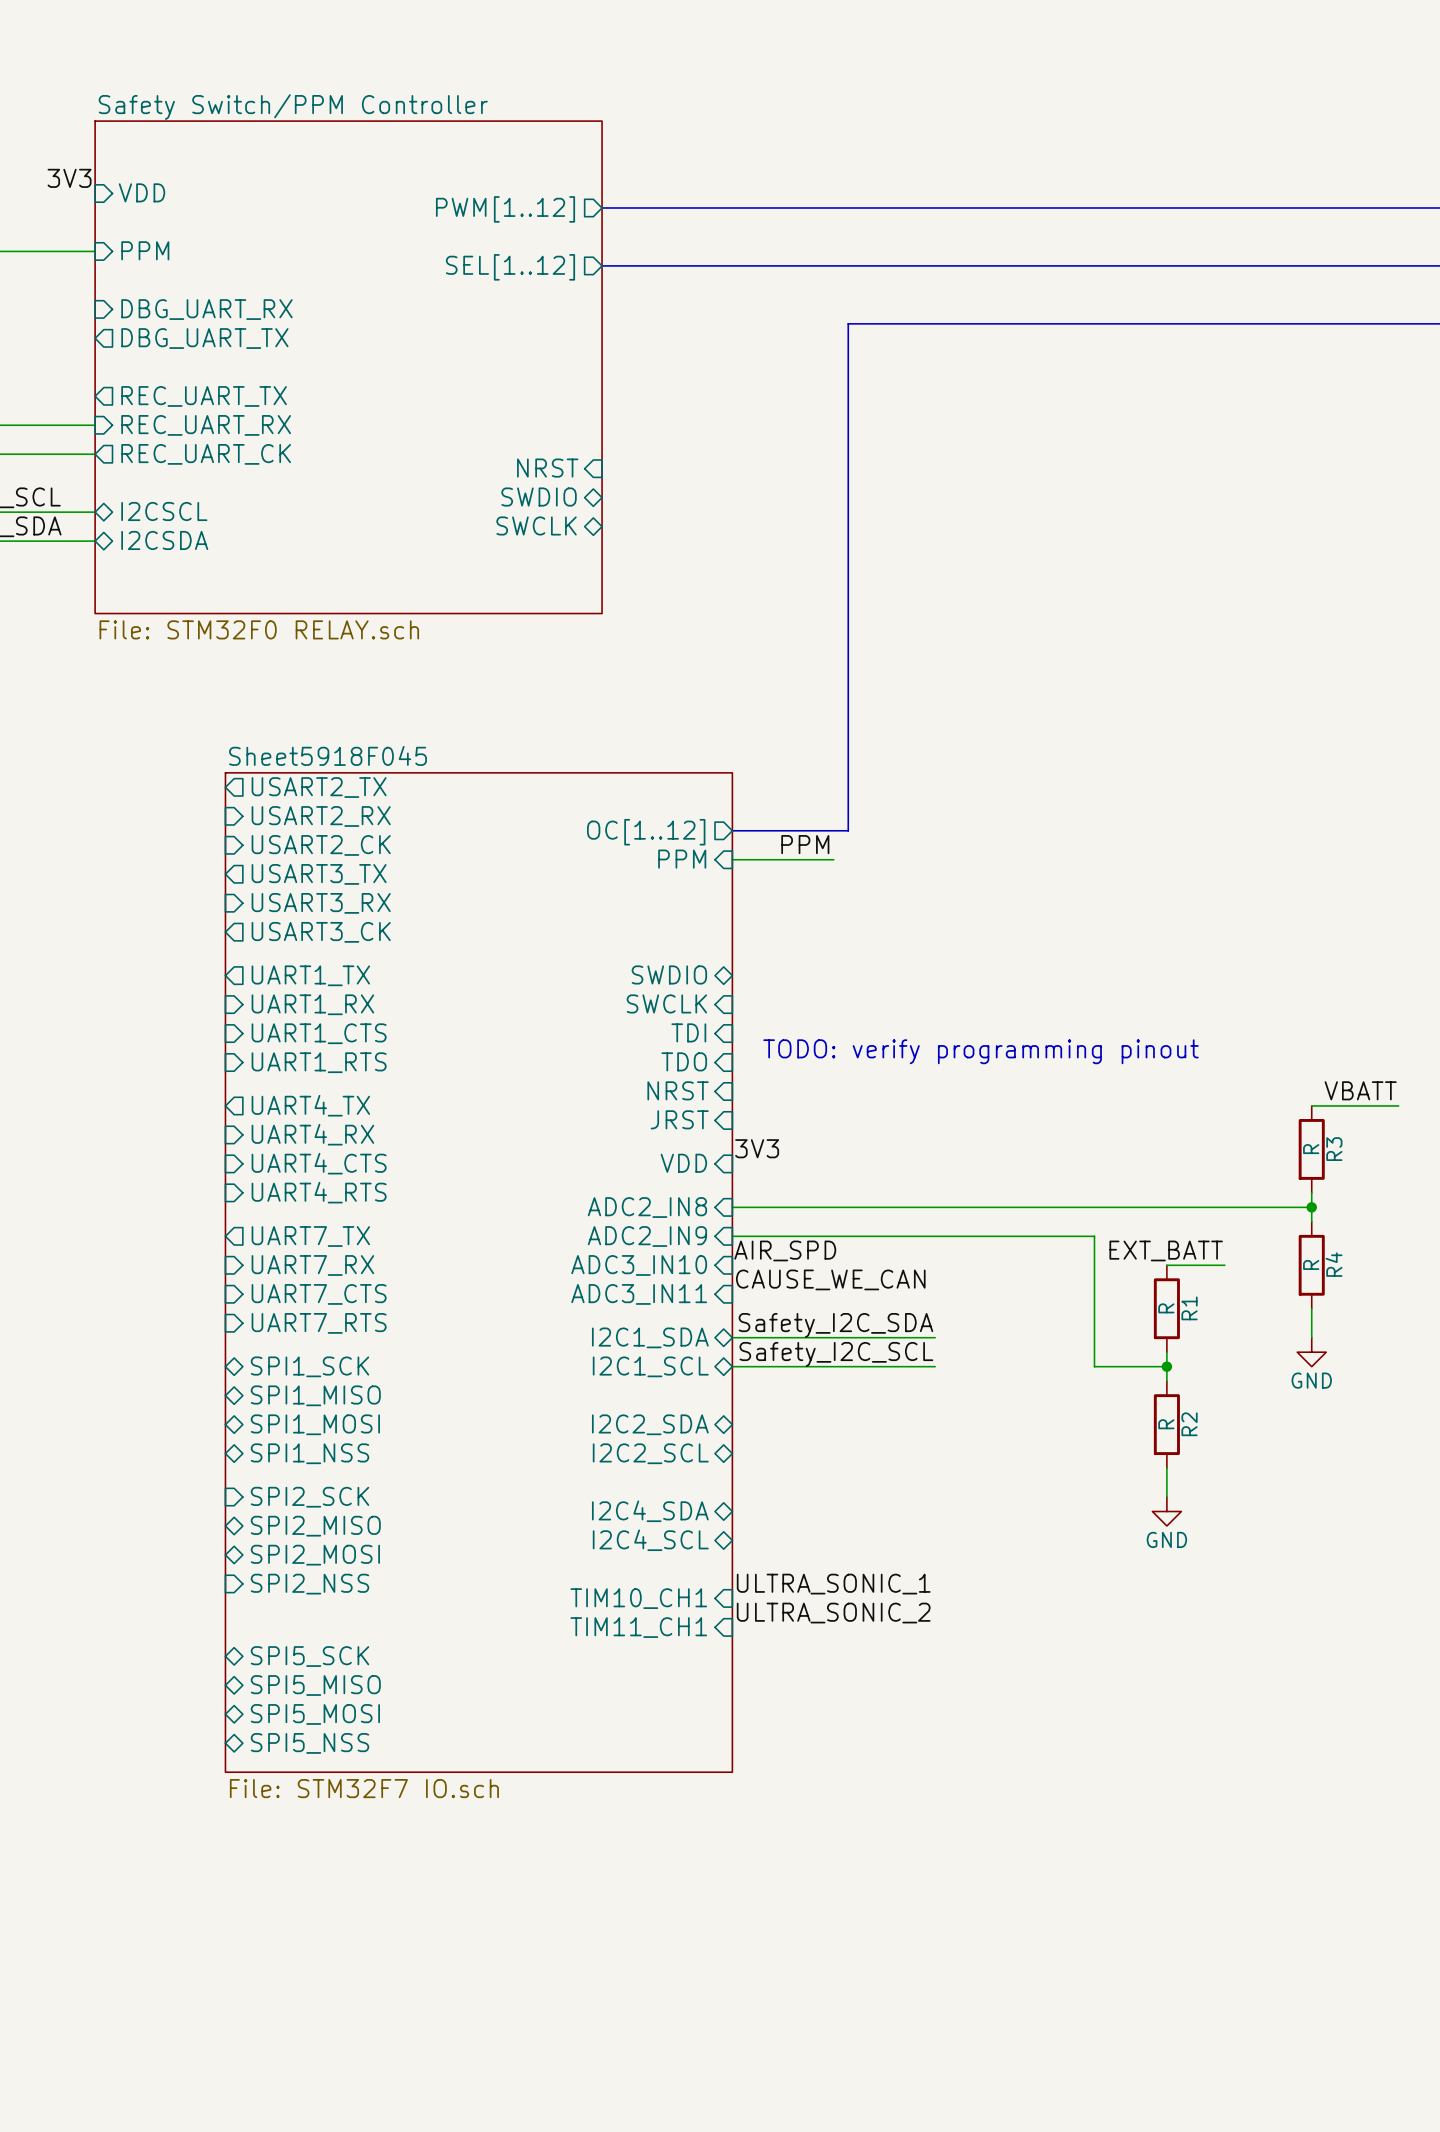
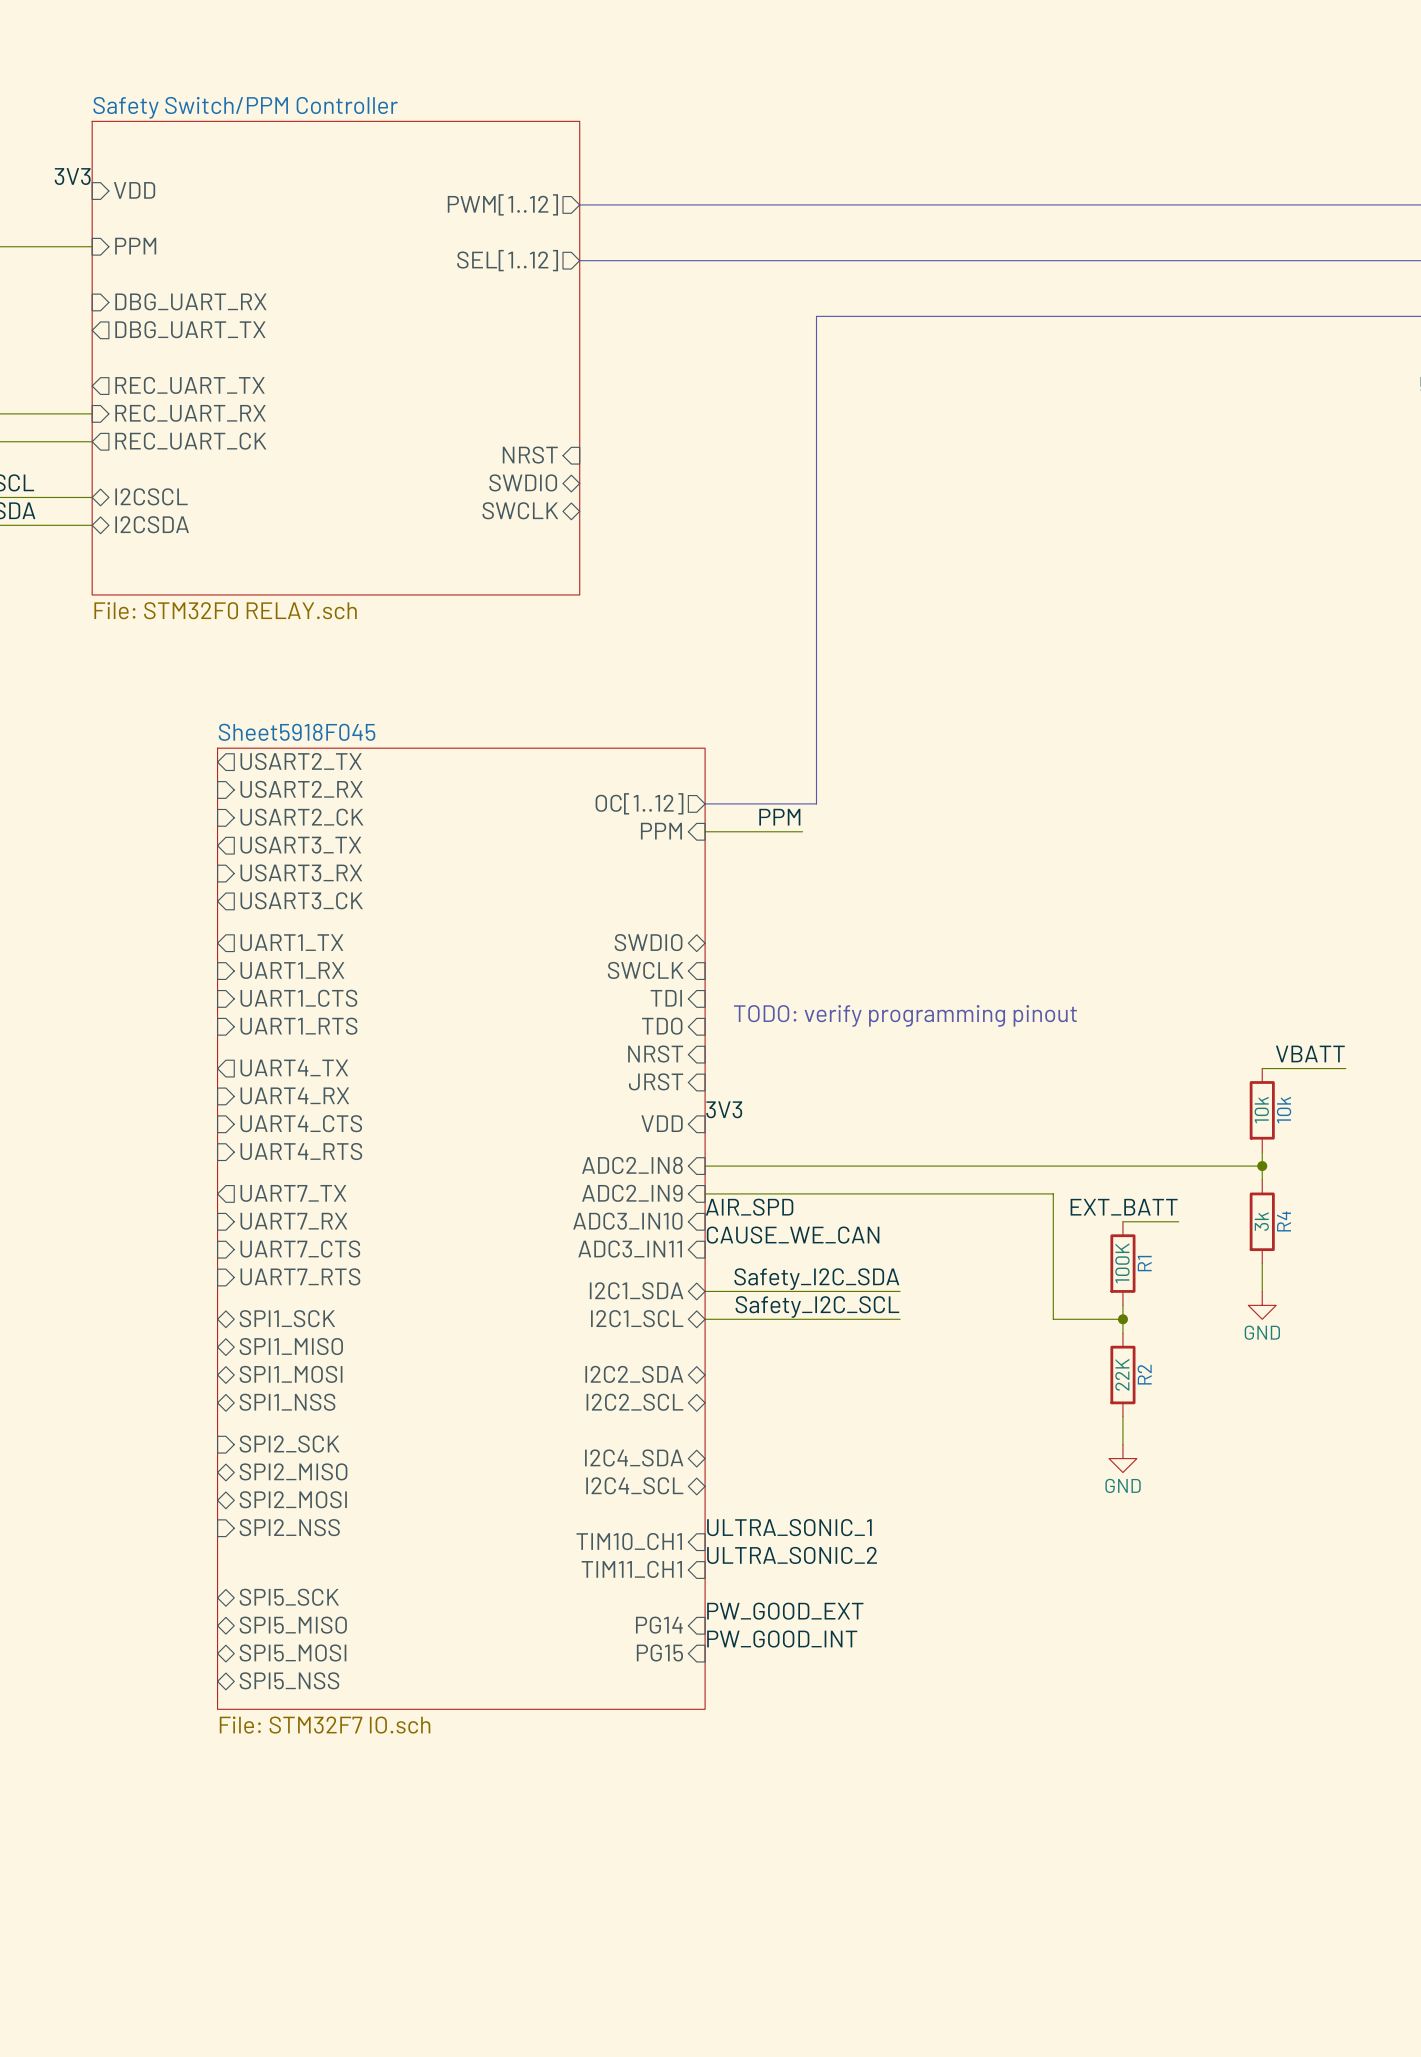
R3 value: R (1311, 1149) -> 10k (1261, 1110)
R3 name: R3 (1334, 1149) -> 10k (1284, 1110)
R4 value: R (1311, 1264) -> 3k (1261, 1221)
R1 value: R (1166, 1308) -> 100K (1122, 1263)
R2 value: R (1166, 1424) -> 22K (1122, 1374)
label: none -> PW_GOOD_EXT (785, 1611)
sheet pin: none -> PG14 (659, 1625)
label: none -> PW_GOOD_INT (782, 1639)
sheet pin: none -> PG15 (659, 1652)

